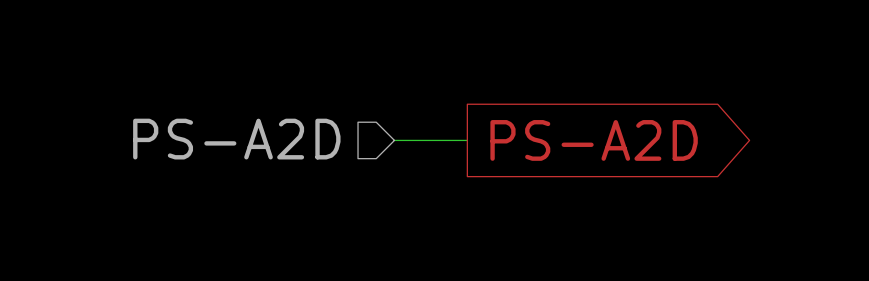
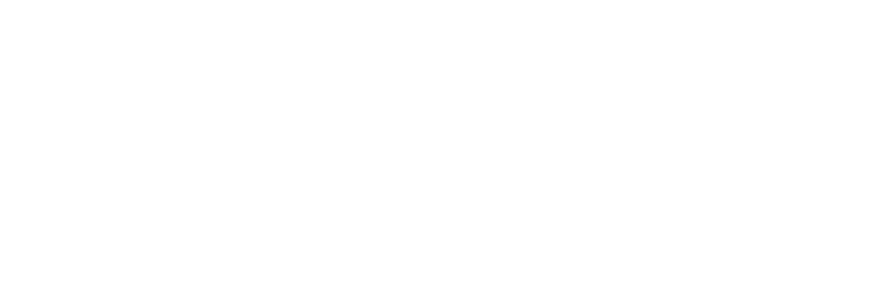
hierarchical label: PS-A2D (236, 139) -> none
wire: (394, 140) (467, 140) -> none
global label: PS-A2D (594, 140) -> none

